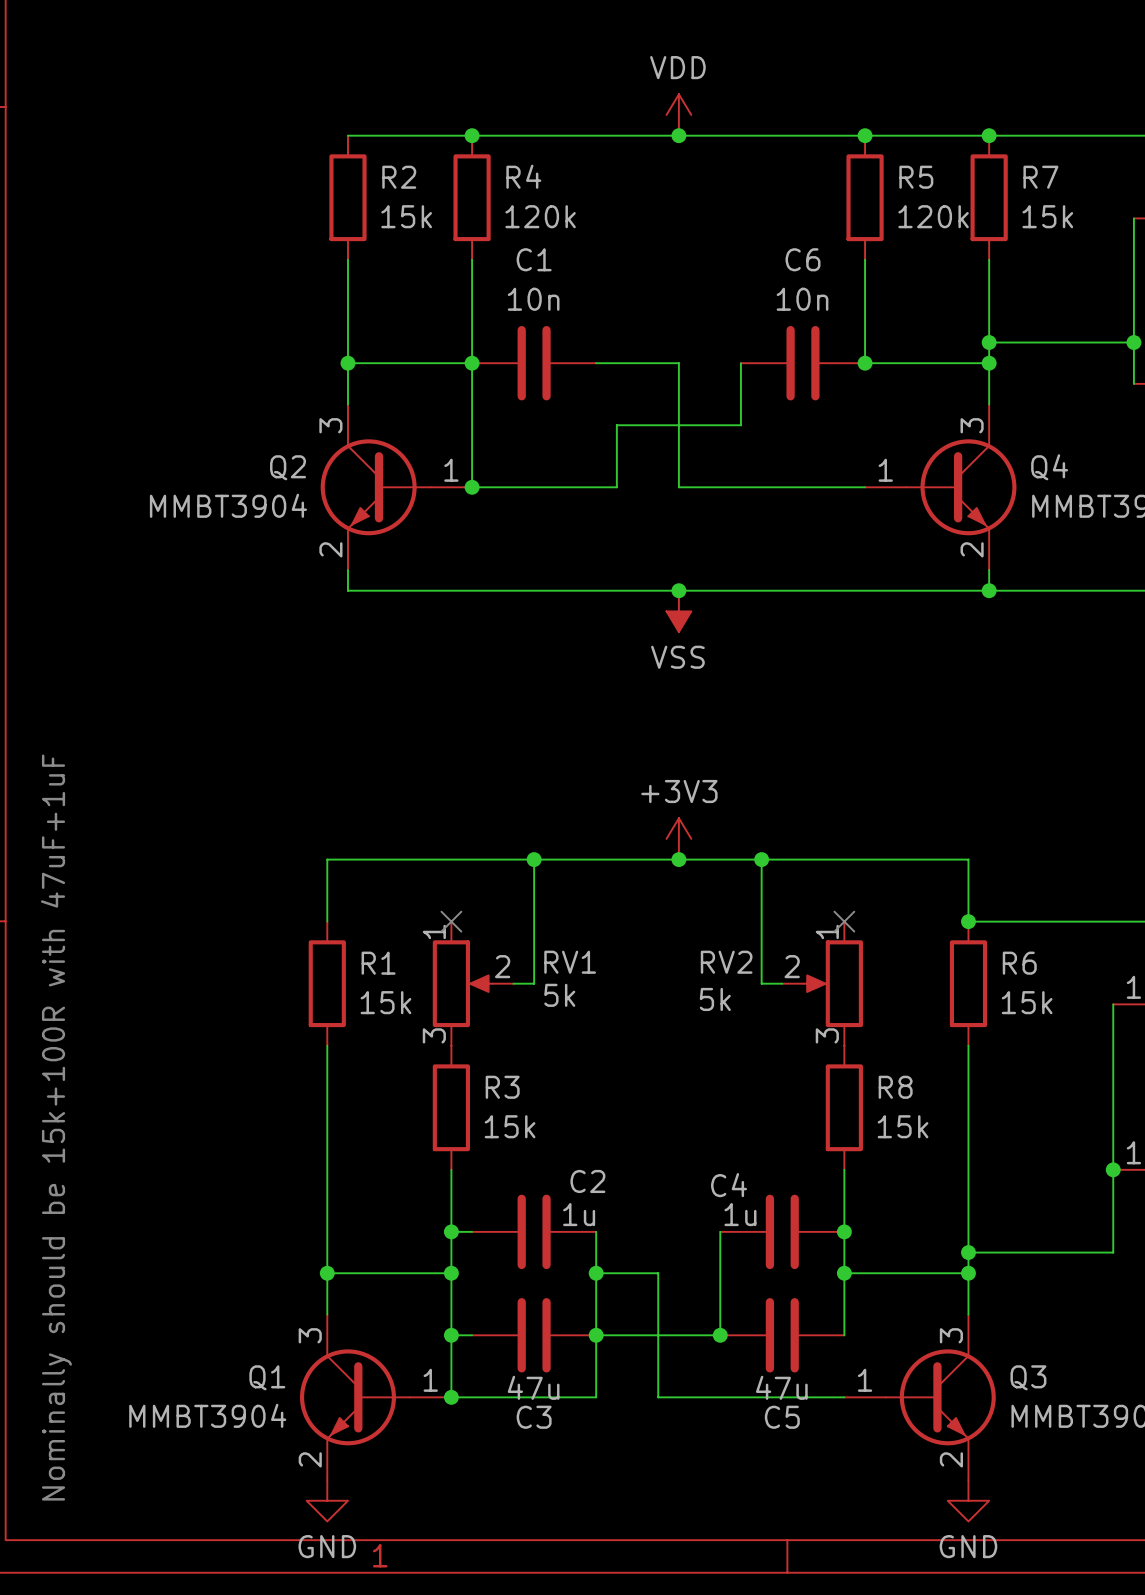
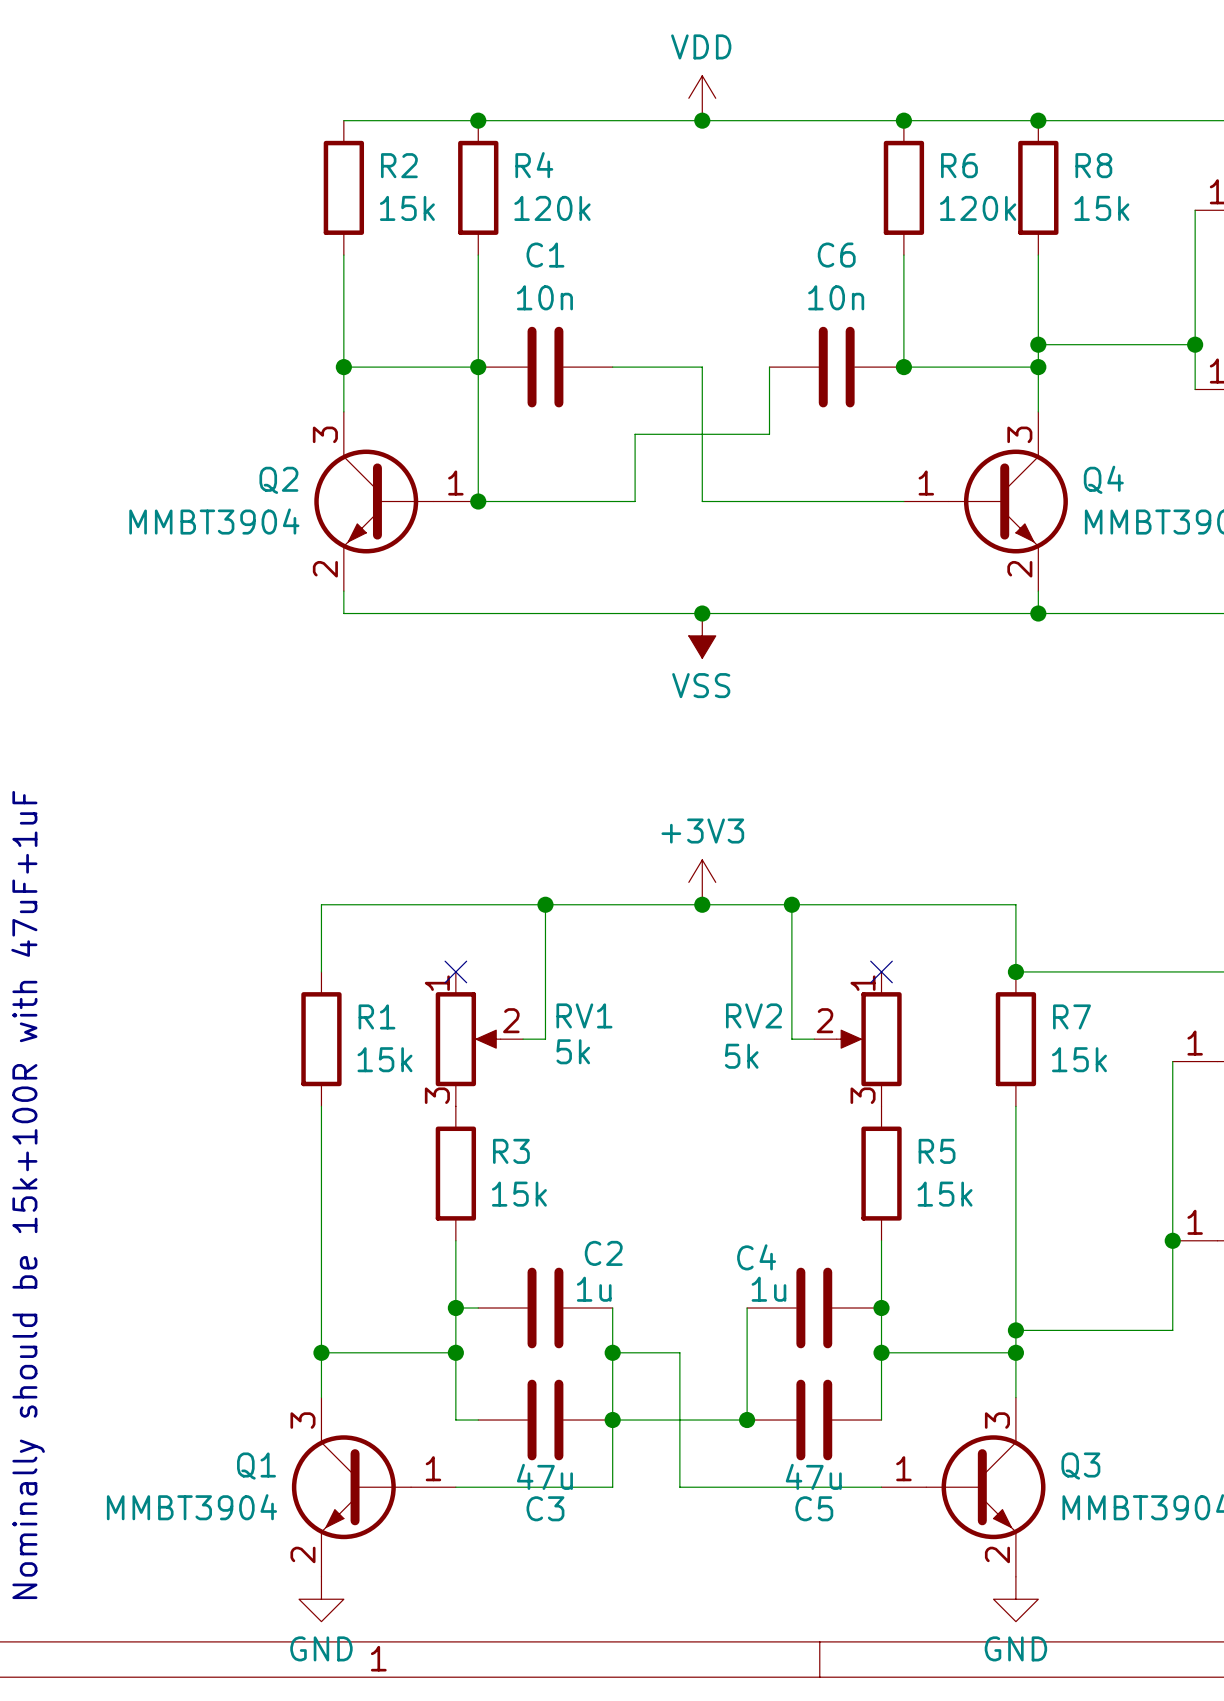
R5 name: R5 (916, 177) -> R6 (959, 165)
R7 name: R7 (1040, 177) -> R8 (1093, 165)
R6 name: R6 (1019, 963) -> R7 (1071, 1016)
R8 name: R8 (895, 1087) -> R5 (937, 1151)
wire: (451, 1335) (451, 1397) -> none
junction: (451, 1335) -> none
junction: (451, 1397) -> none

